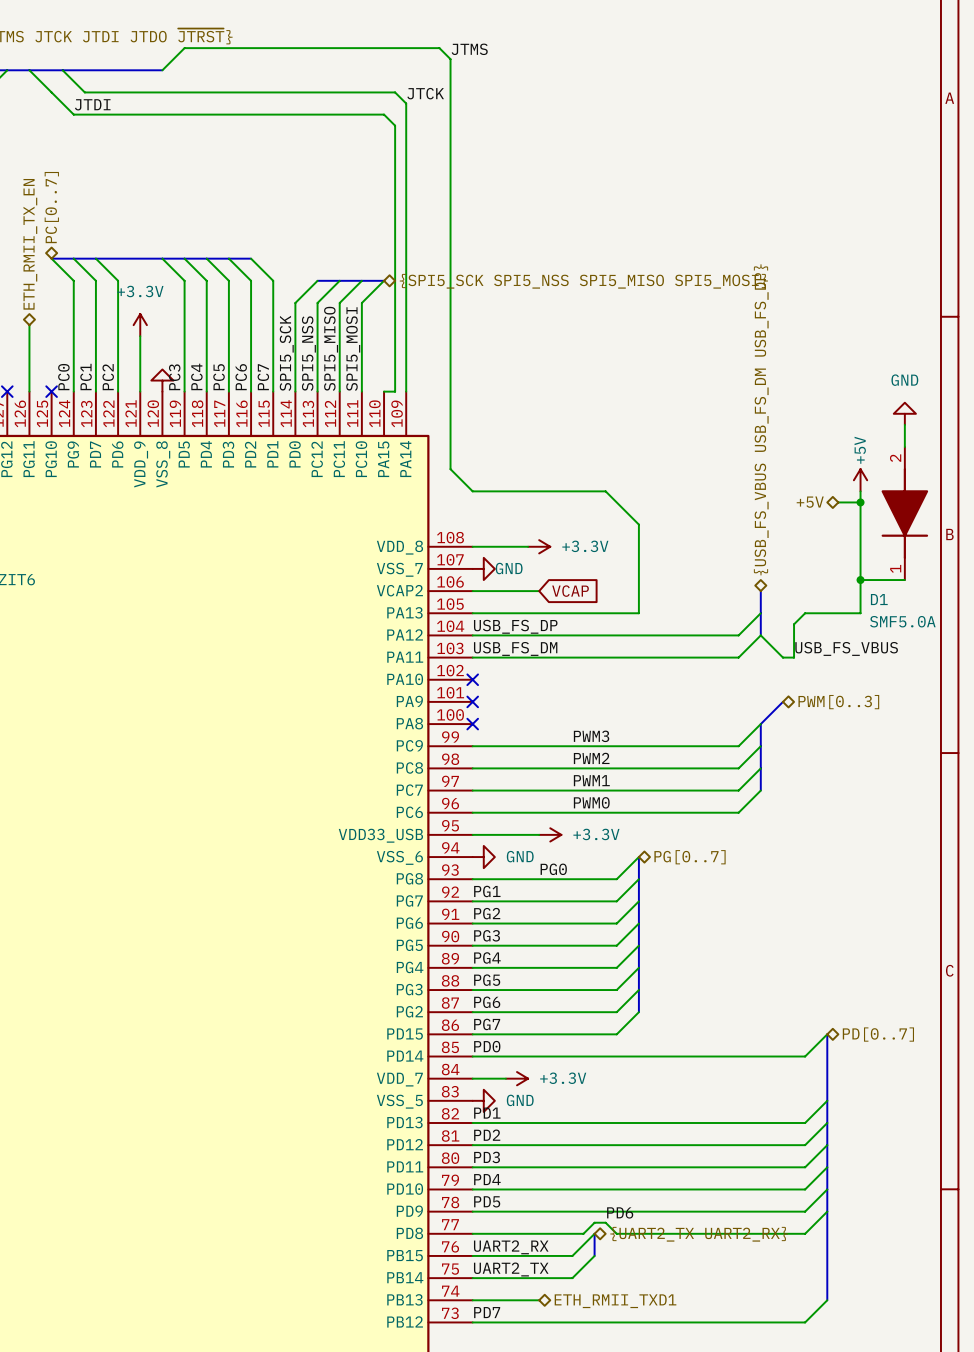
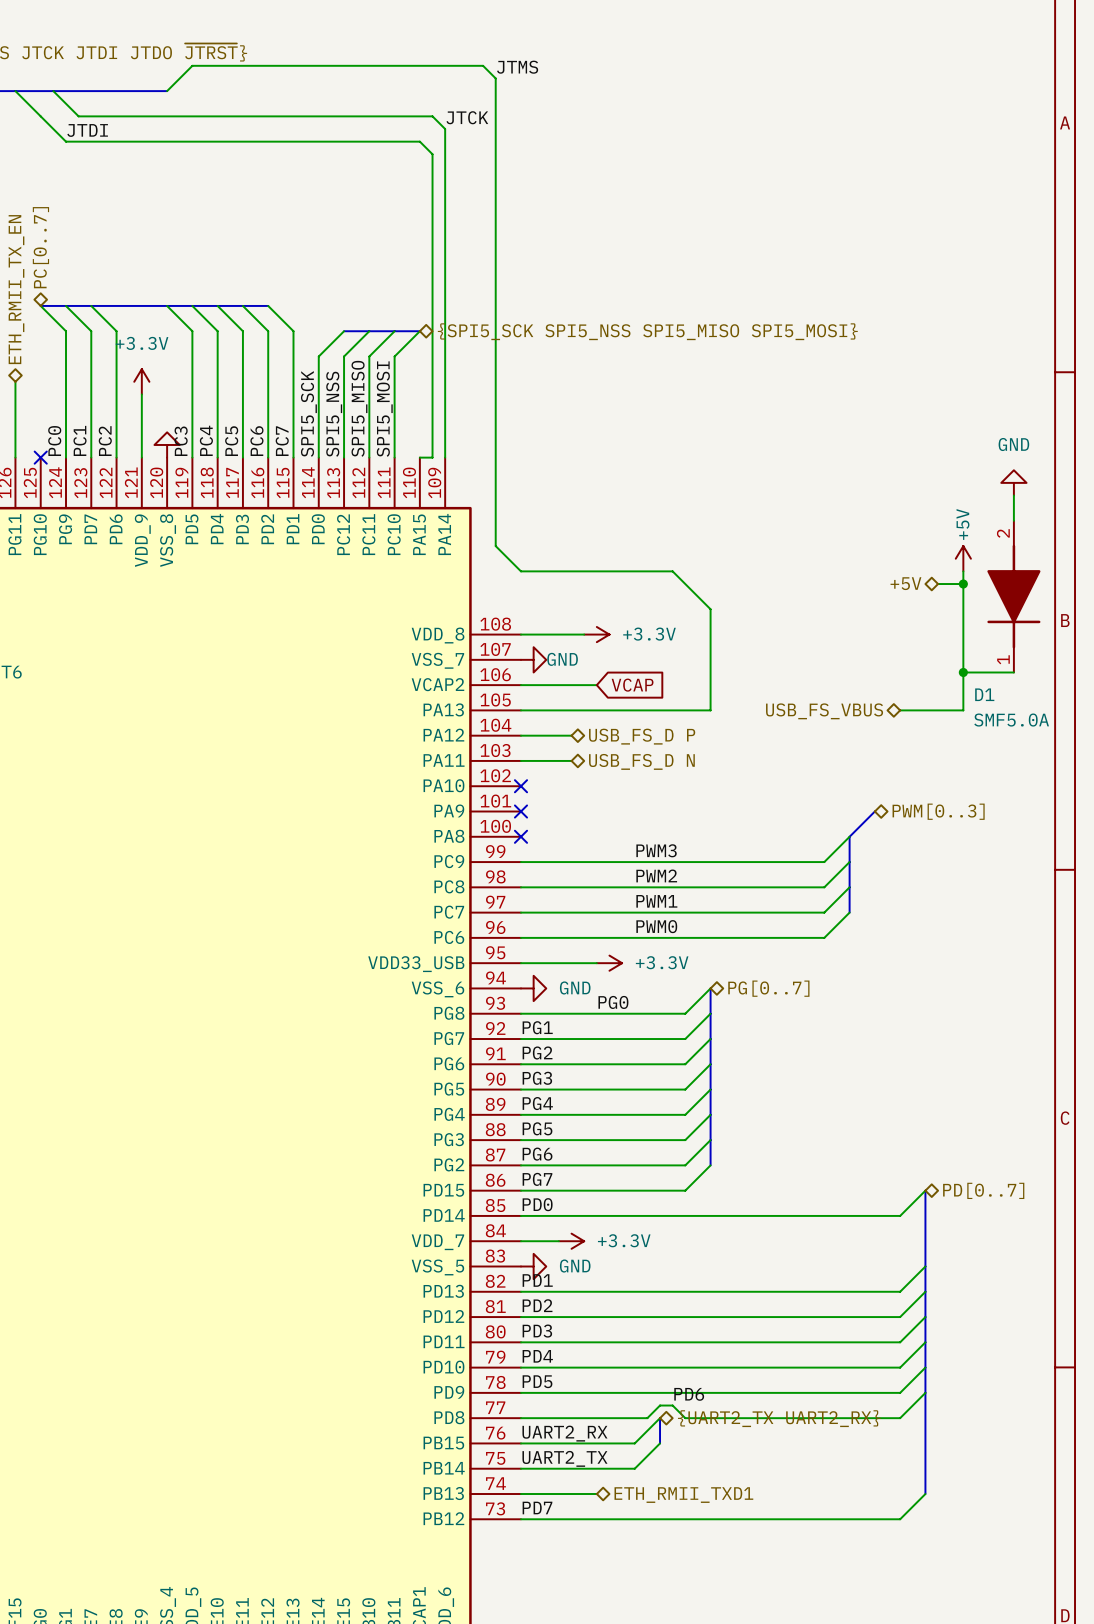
hierarchical label: {USB_FS_VBUS USB_FS_DM USB_FS_DP} (761, 419) -> none
bus: (760, 591) (760, 635) -> none
wire: (760, 613) (738, 635) (517, 635) -> none
wire: (805, 613) (794, 624) (794, 657) (782, 657) (760, 635) (738, 657) (517, 657) -> none
hierarchical label: none -> USB_FS_VBUS (824, 711)
label: USB_FS_DP (515, 626) -> none
hierarchical label: none -> USB_FS_D P (642, 736)
label: USB_FS_DM (515, 648) -> none
label: USB_FS_VBUS (846, 648) -> none
hierarchical label: none -> USB_FS_D N (641, 761)

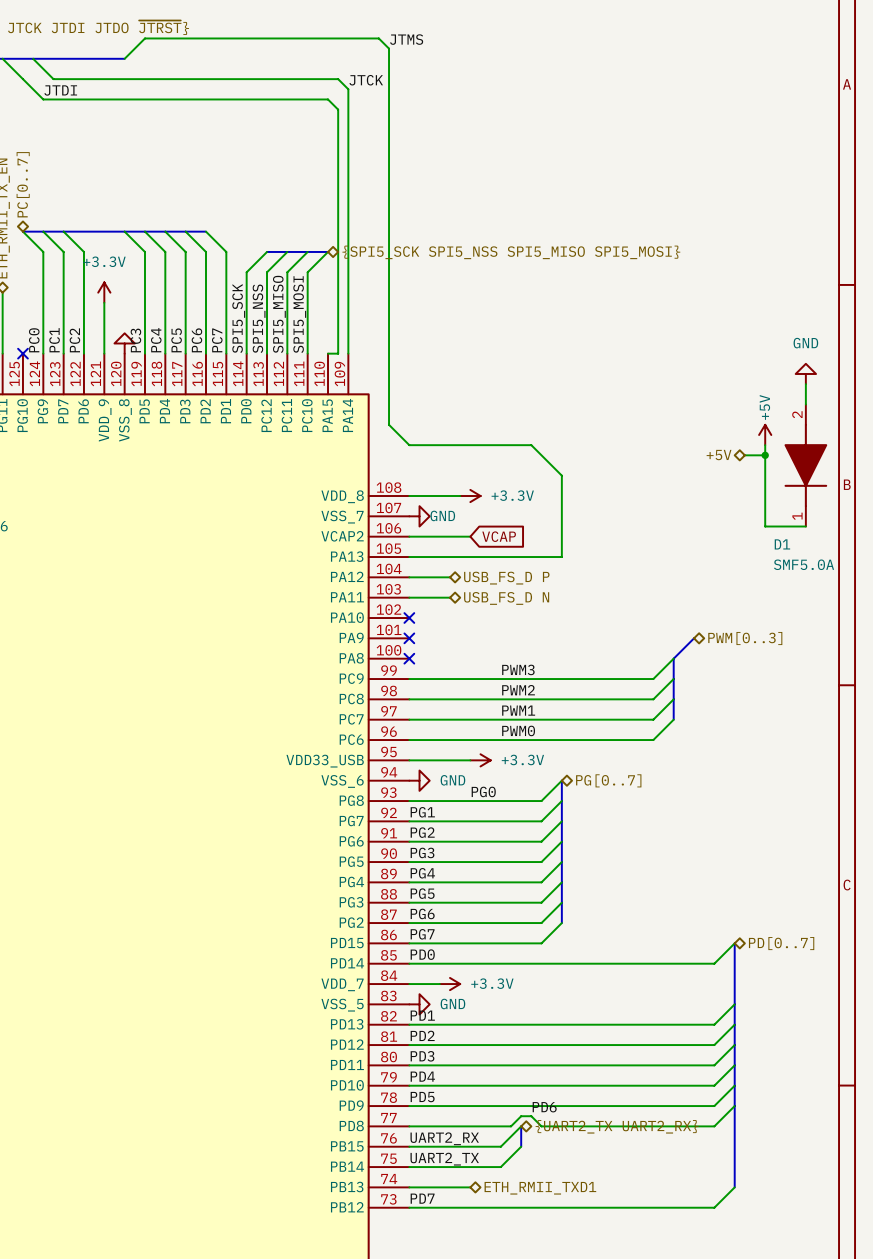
wire: (963, 672) (963, 710) (900, 710) -> none
junction: (963, 672) -> none
hierarchical label: USB_FS_VBUS (824, 711) -> none

